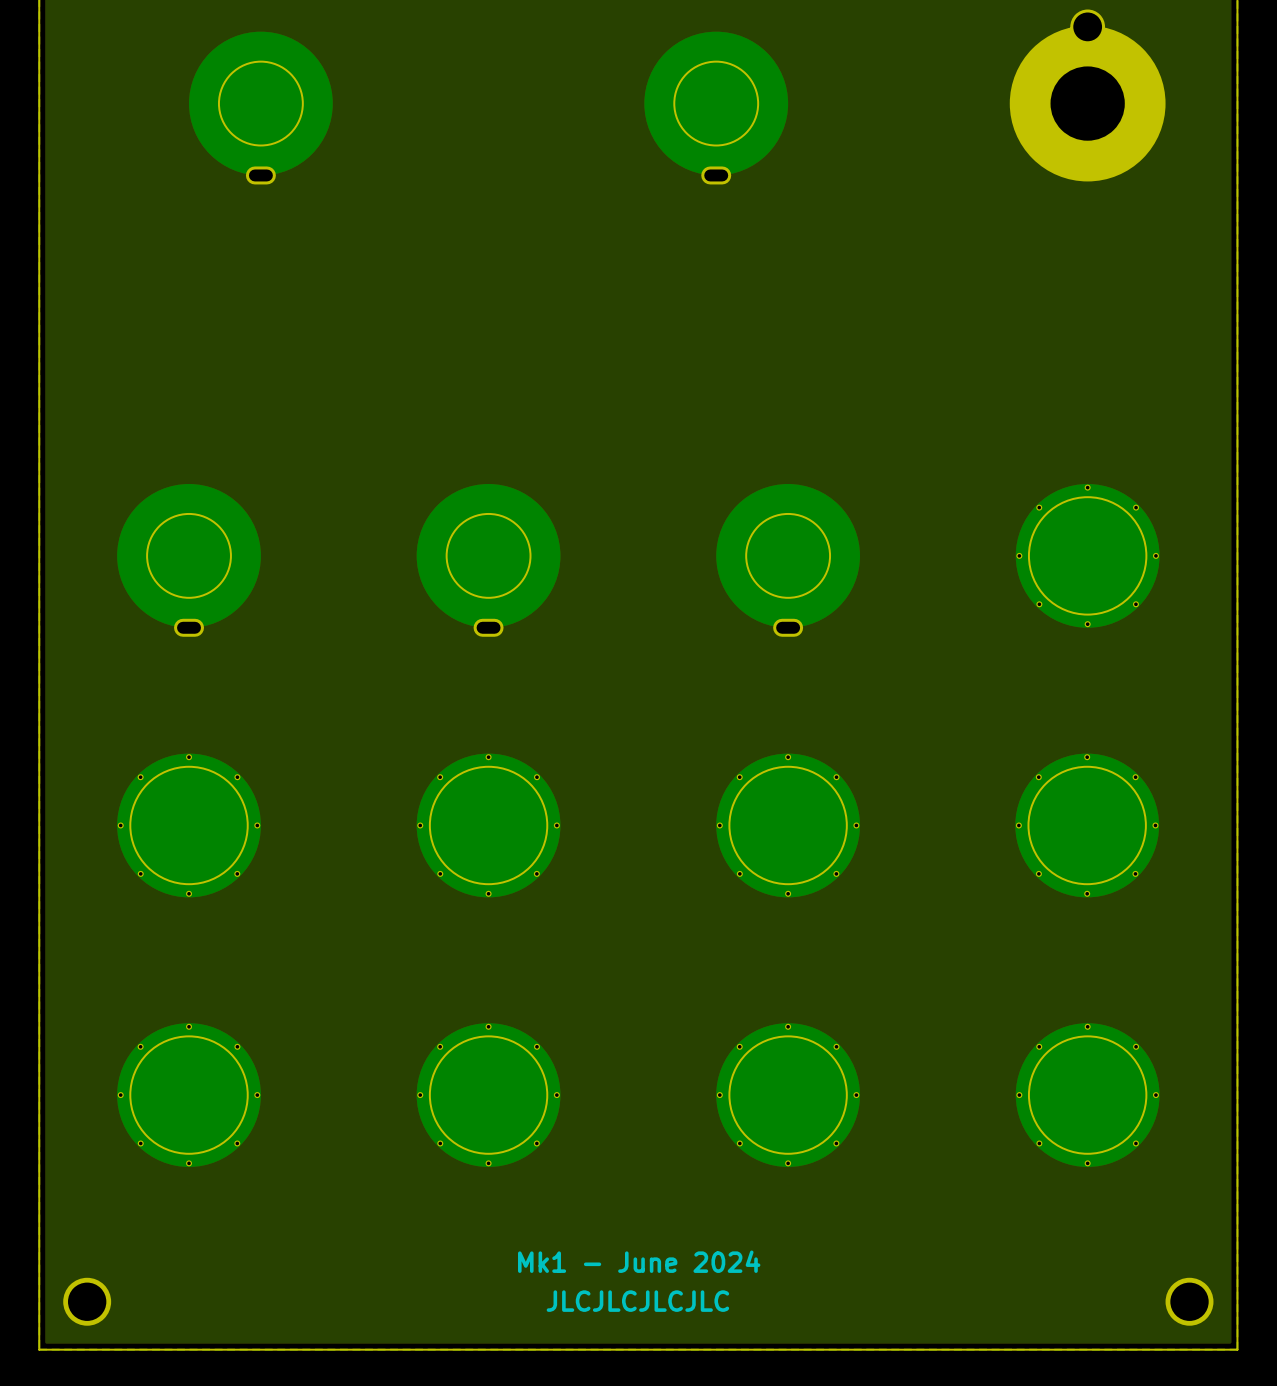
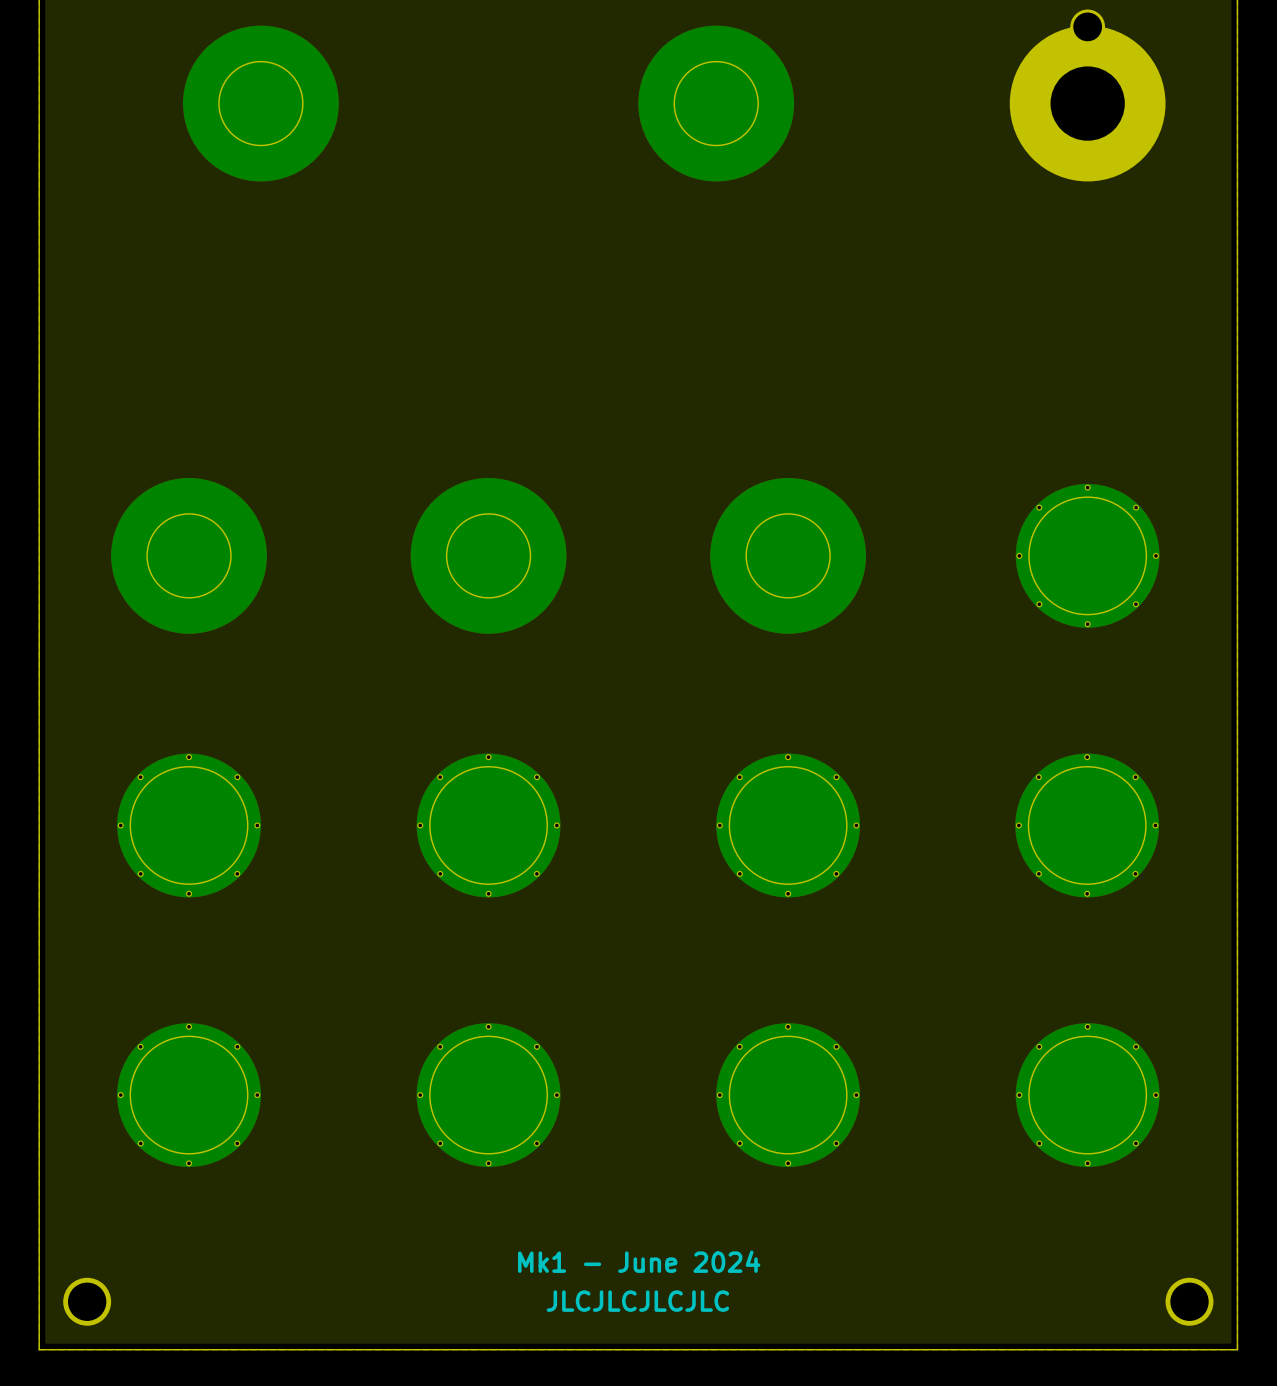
part footprint: [189, 31, 333, 185] -> [183, 25, 339, 182]
part footprint: [644, 31, 789, 185] -> [638, 25, 795, 182]
part footprint: [117, 483, 261, 637] -> [111, 478, 267, 634]
part footprint: [416, 483, 561, 637] -> [410, 478, 567, 634]
part footprint: [716, 483, 861, 637] -> [710, 478, 867, 634]

